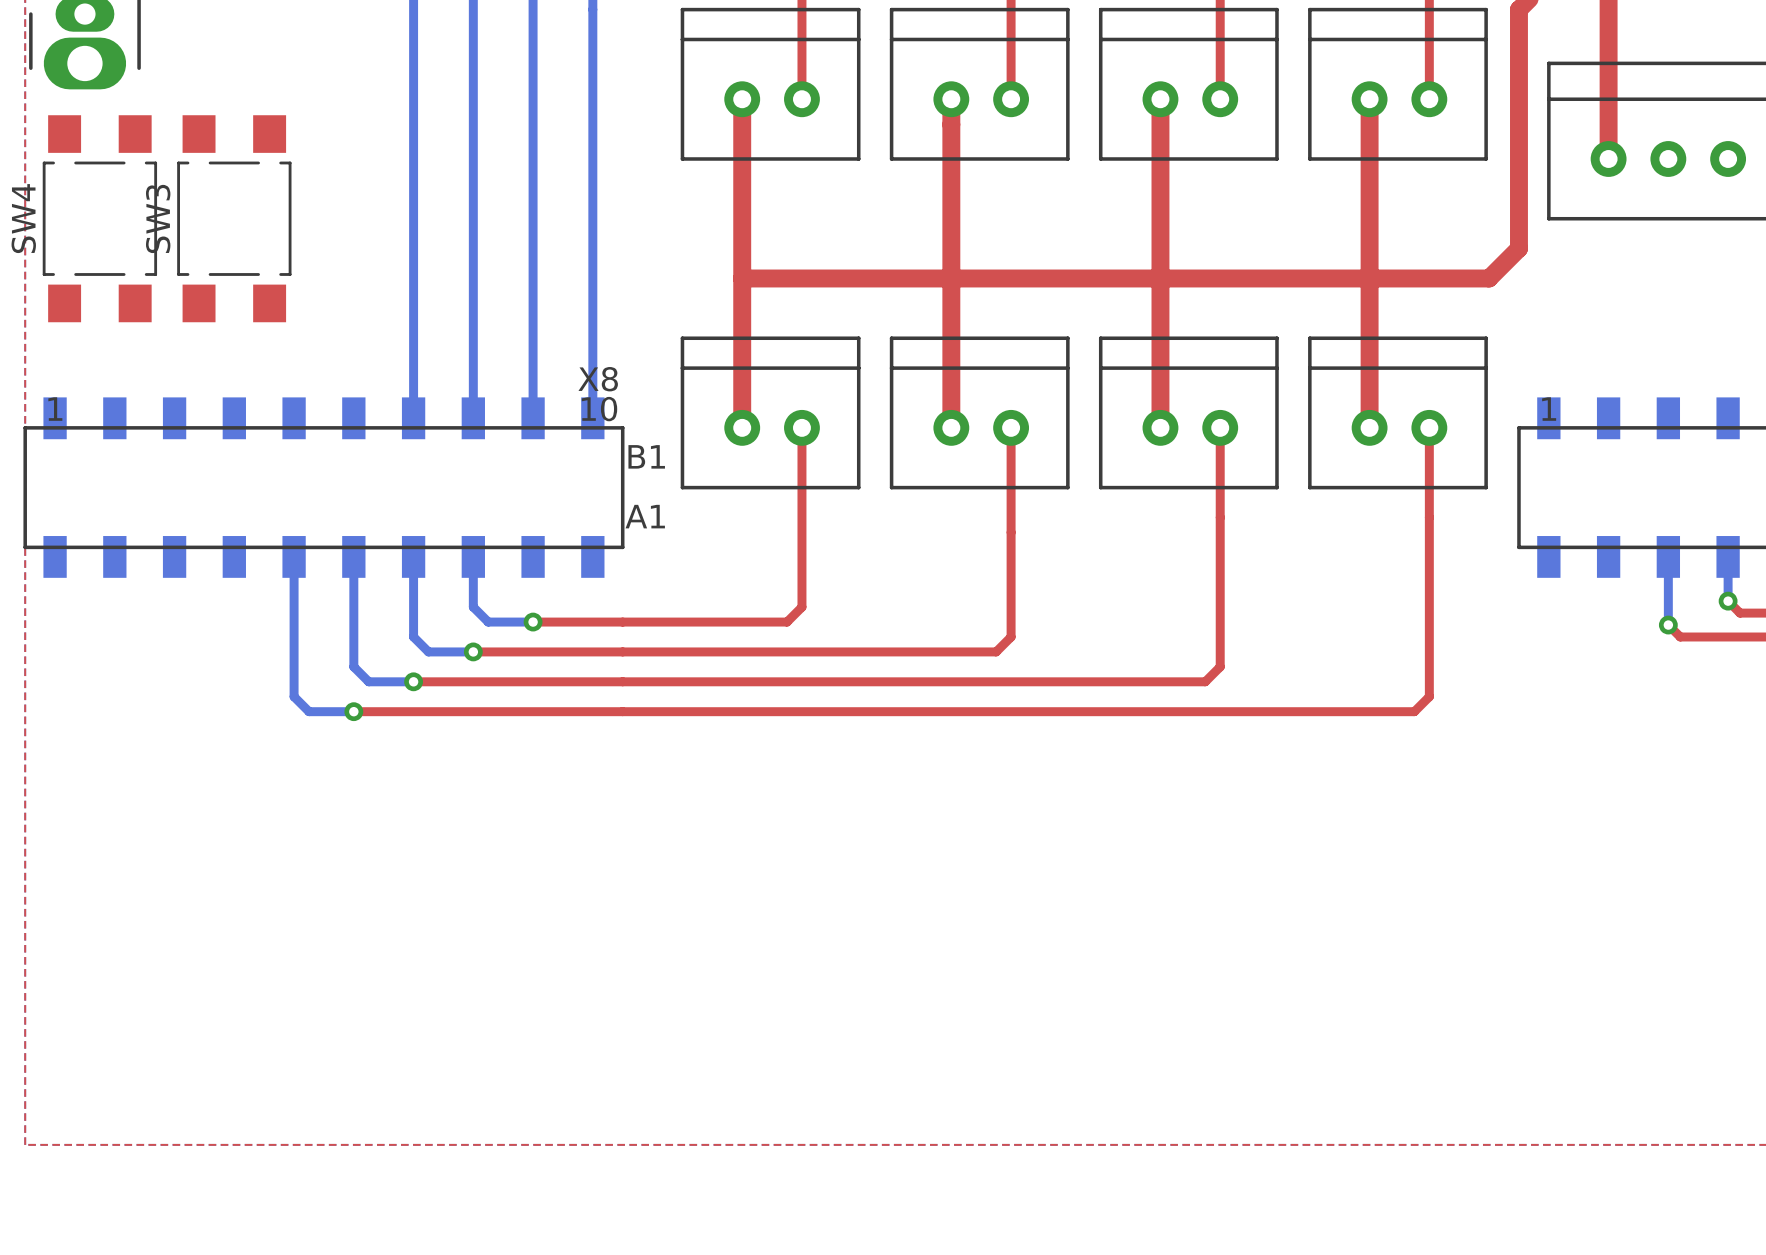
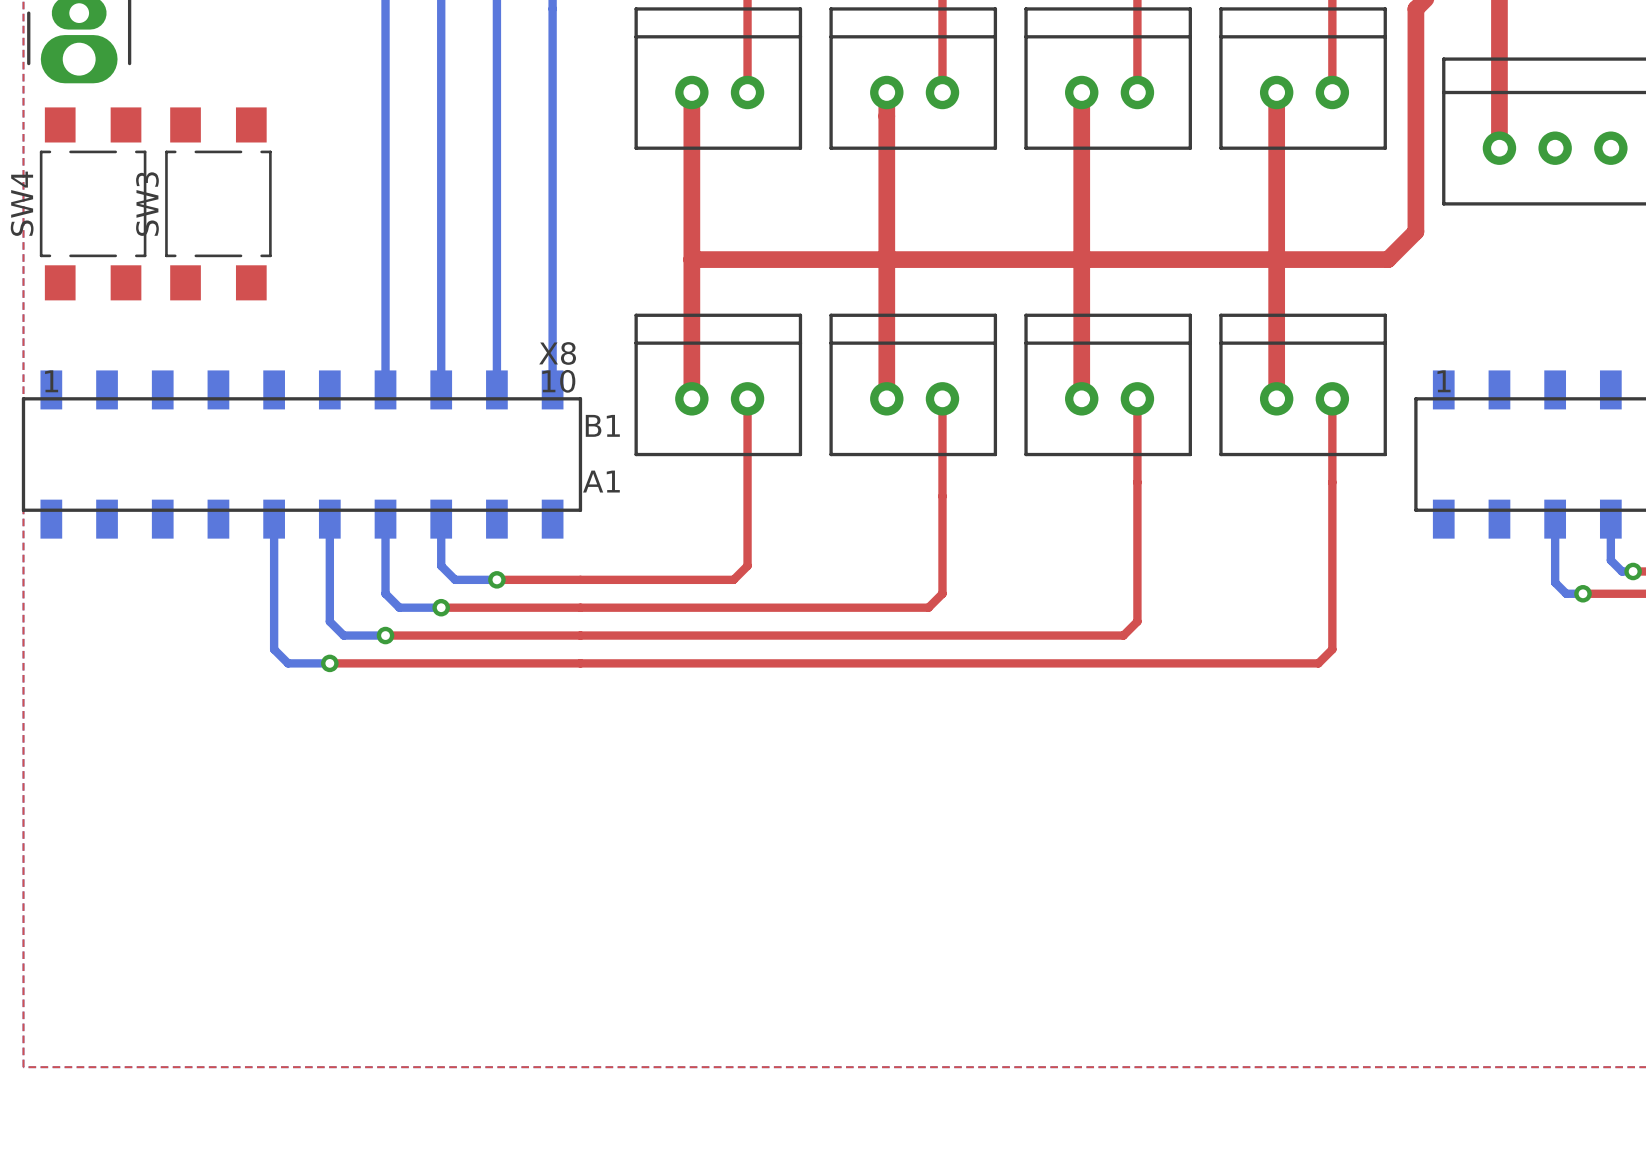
top track: (1728, 601) (1740, 613) (1752, 613) -> none
bottom track: none -> (1610, 560) (1621, 571) (1633, 571)
via: (1728, 601) -> none
via: none -> (1633, 571)
top track: (1668, 625) (1680, 636) (1698, 636) -> none
bottom track: none -> (1555, 582) (1566, 593) (1582, 593)
via: (1668, 625) -> none
via: none -> (1582, 593)

